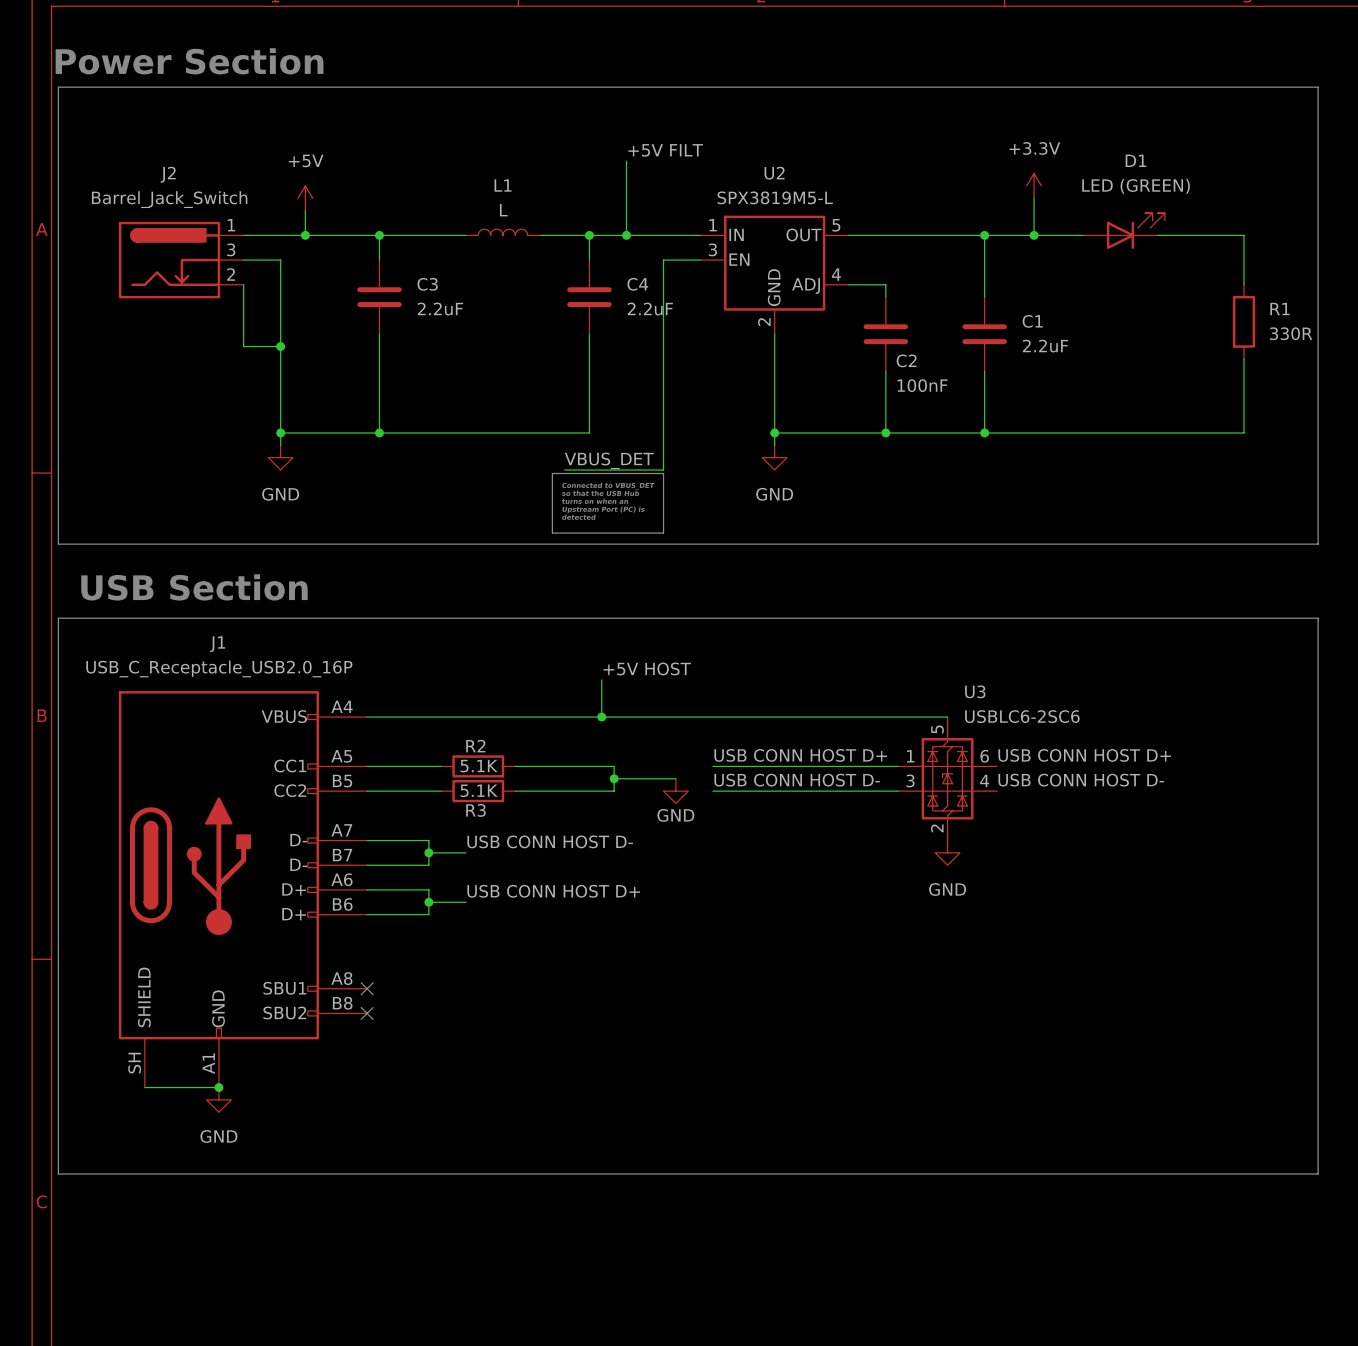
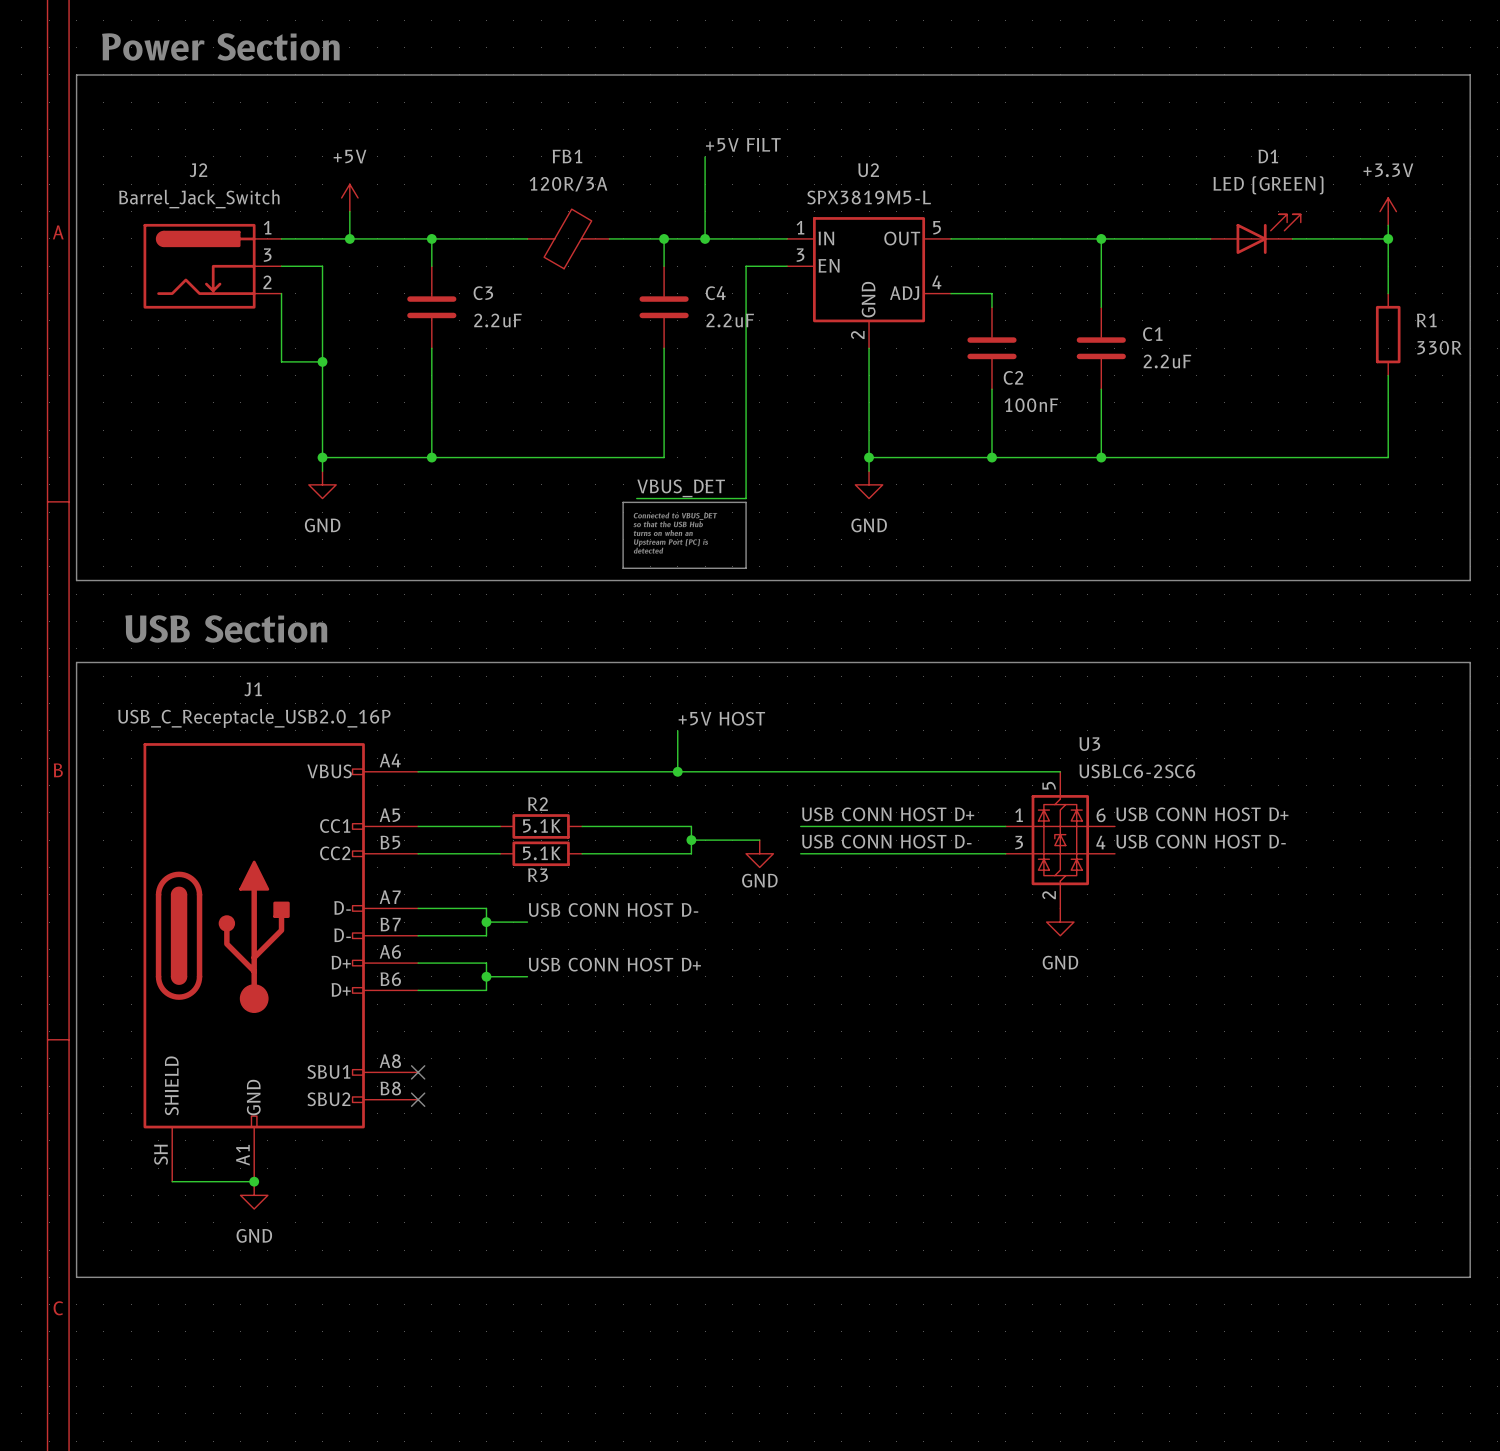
power symbol position: +3.3V (1034, 185) -> +3.3V (1388, 211)
wire: (1034, 198) (1034, 235) -> none
wire: none -> (1388, 225) (1388, 238)
L1: L (502, 232) -> none
FB1: none -> 120R/3A (568, 238)
junction: (1034, 235) -> none
junction: none -> (1388, 238)

